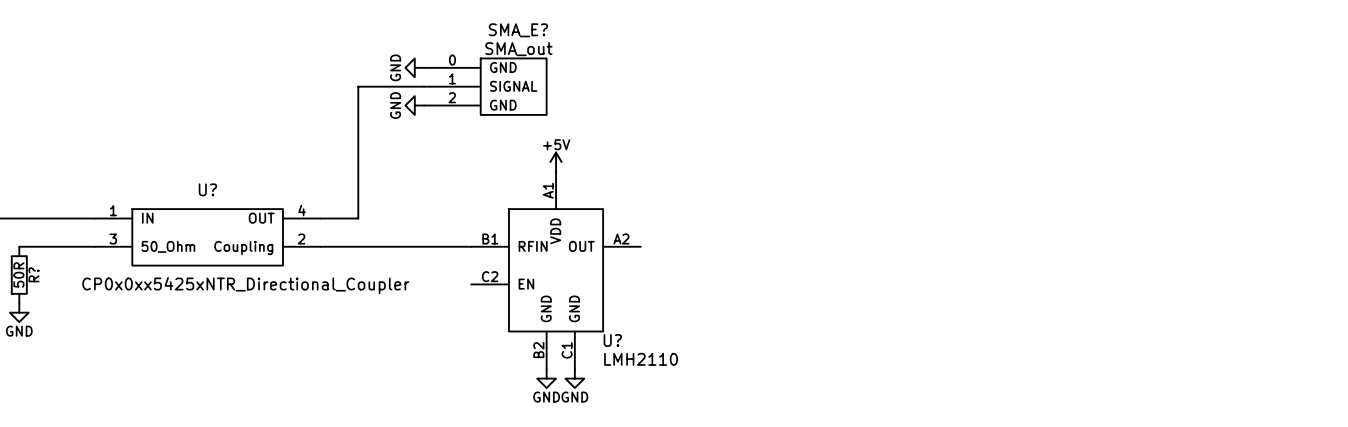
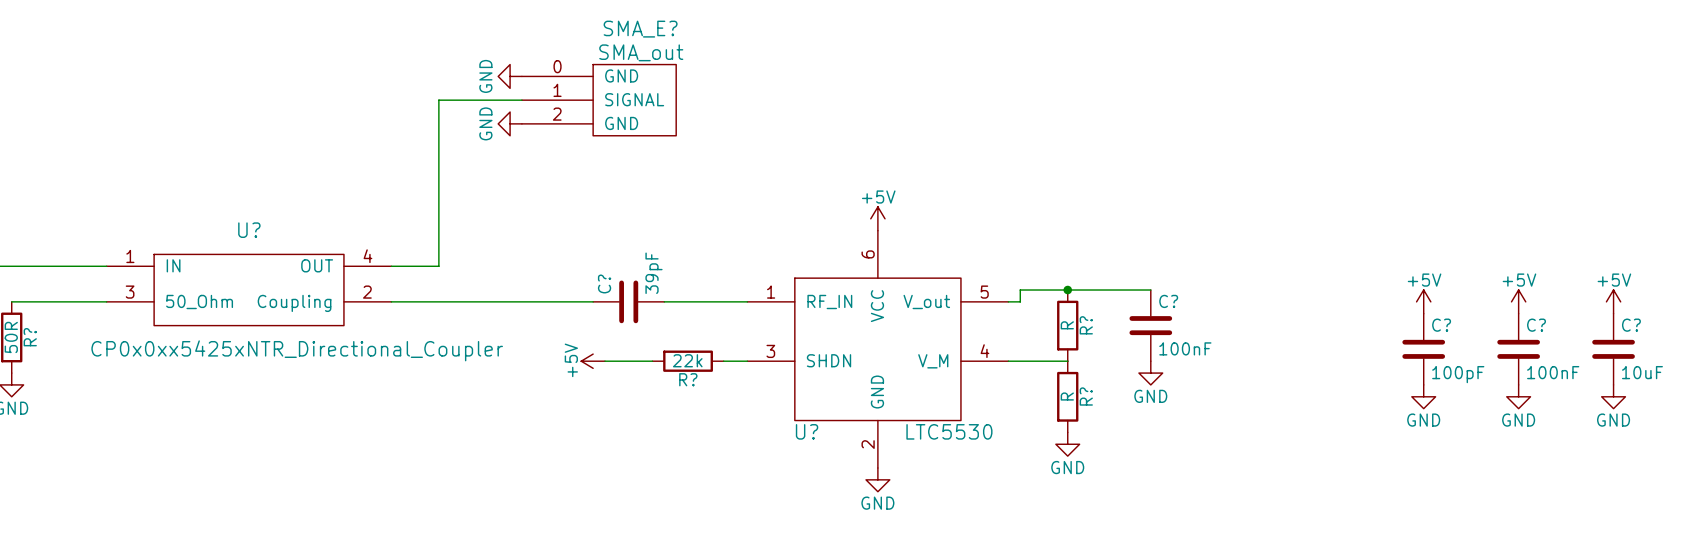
power symbol: +5V (556, 162) -> none
power symbol: none -> +5V (877, 218)
junction: none -> (1067, 290)
wire: none -> (1150, 290) (1020, 290) (1020, 301) (1008, 301)
C?: none -> 39pF (628, 301)
wire: none -> (664, 301) (747, 301)
power symbol: none -> +5V (1423, 301)
power symbol: none -> +5V (1518, 301)
power symbol: none -> +5V (1613, 301)
R?: none -> R (1067, 325)
C?: none -> 100nF (1150, 325)
U?: LMH2110 (556, 270) -> none
U?: none -> LTC5530 (877, 349)
C?: none -> 100pF (1423, 349)
C?: none -> 100nF (1518, 349)
C?: none -> 10uF (1613, 349)
power symbol: none -> +5V (593, 361)
wire: none -> (604, 361) (652, 361)
R?: none -> 22k (688, 361)
wire: none -> (723, 361) (747, 361)
wire: none -> (1008, 361) (1067, 361)
power symbol: none -> GND (1150, 373)
R?: none -> R (1067, 396)
power symbol: none -> GND (1423, 396)
power symbol: none -> GND (1518, 396)
power symbol: none -> GND (1613, 396)
power symbol: none -> GND (1067, 444)
power symbol: GND (546, 378) -> none
power symbol: GND (574, 378) -> none
power symbol: none -> GND (877, 479)

